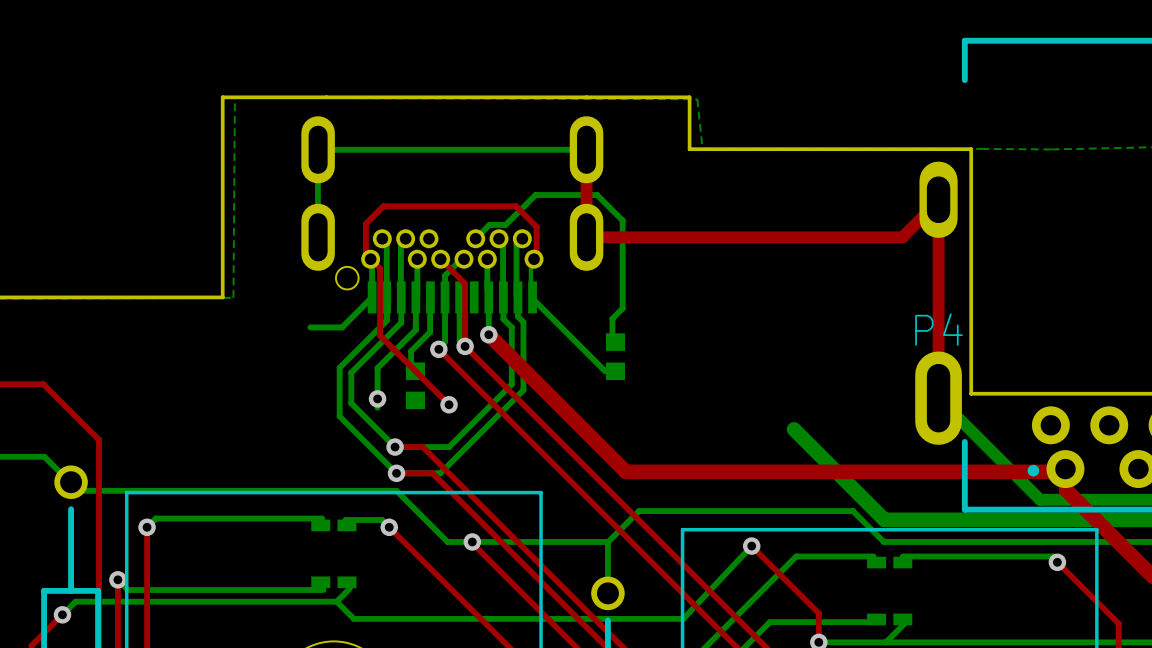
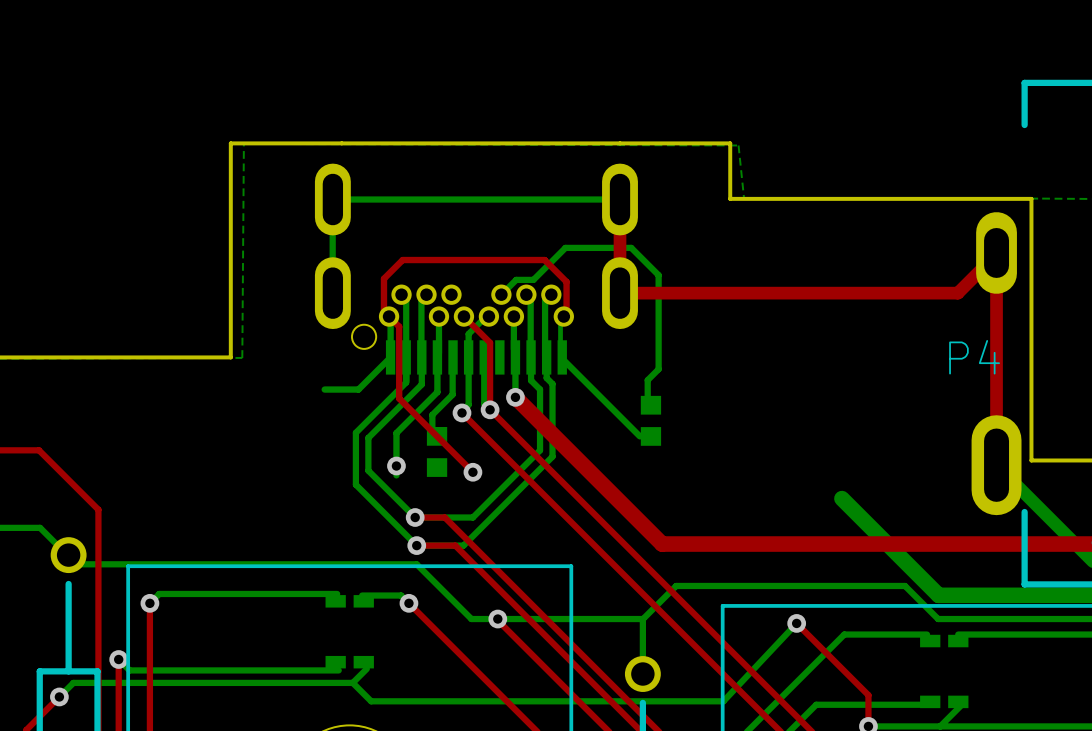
P4 name position: P4 (938, 329) -> P4 (974, 357)

